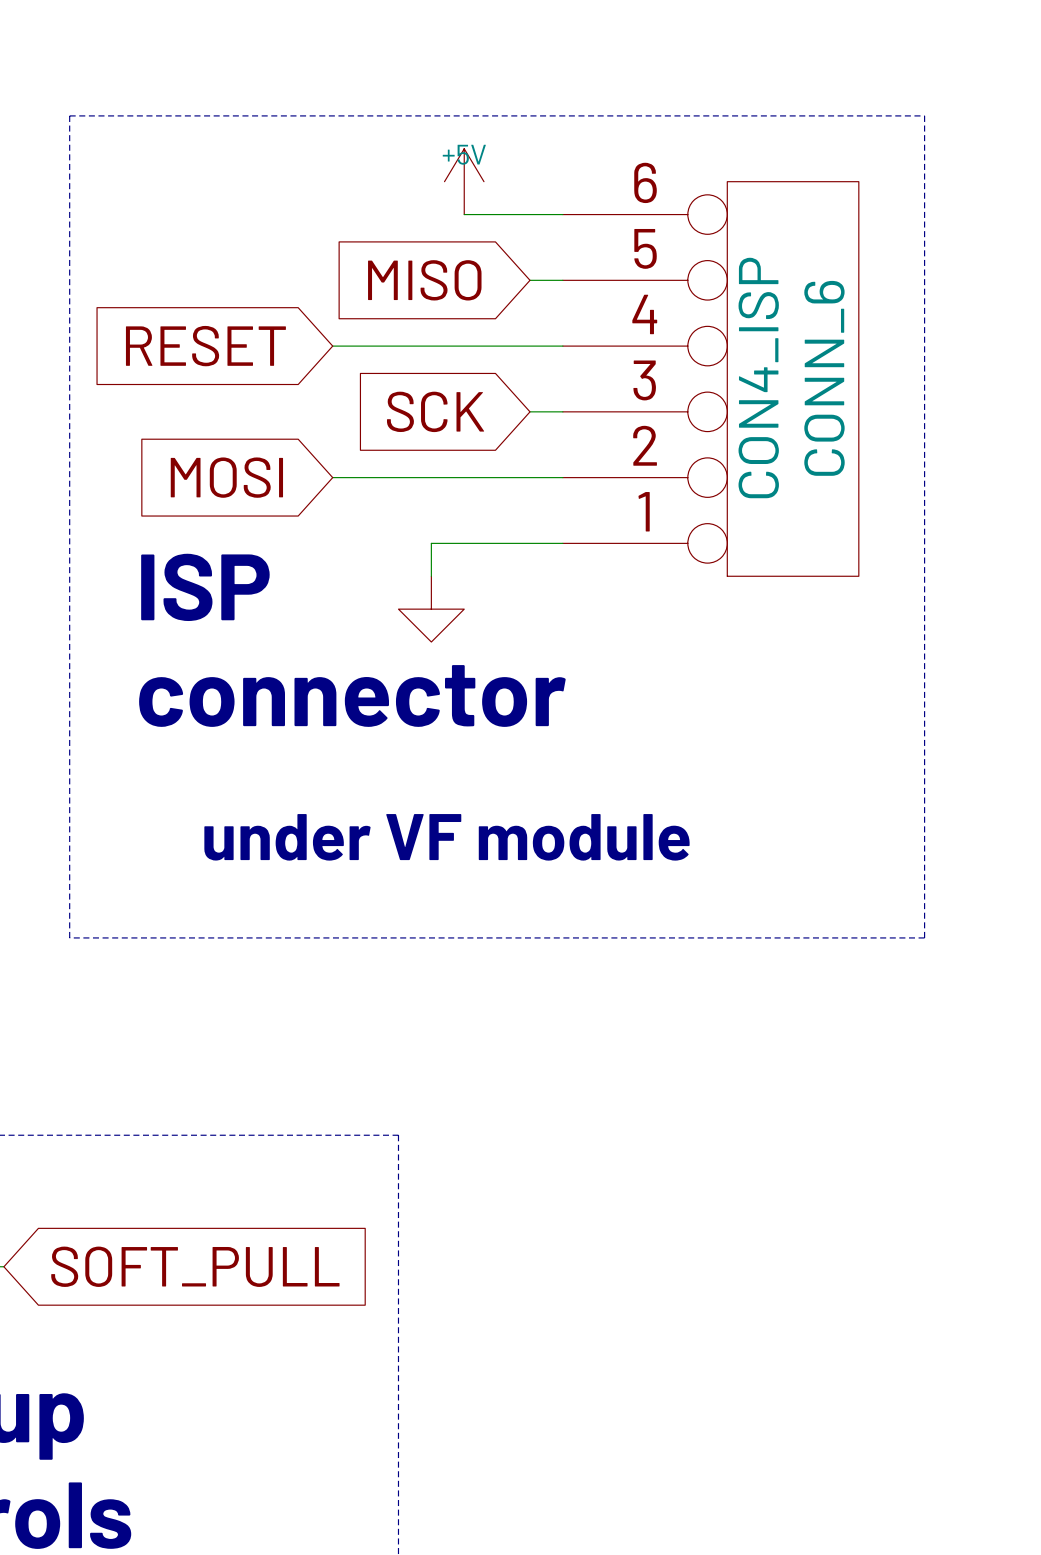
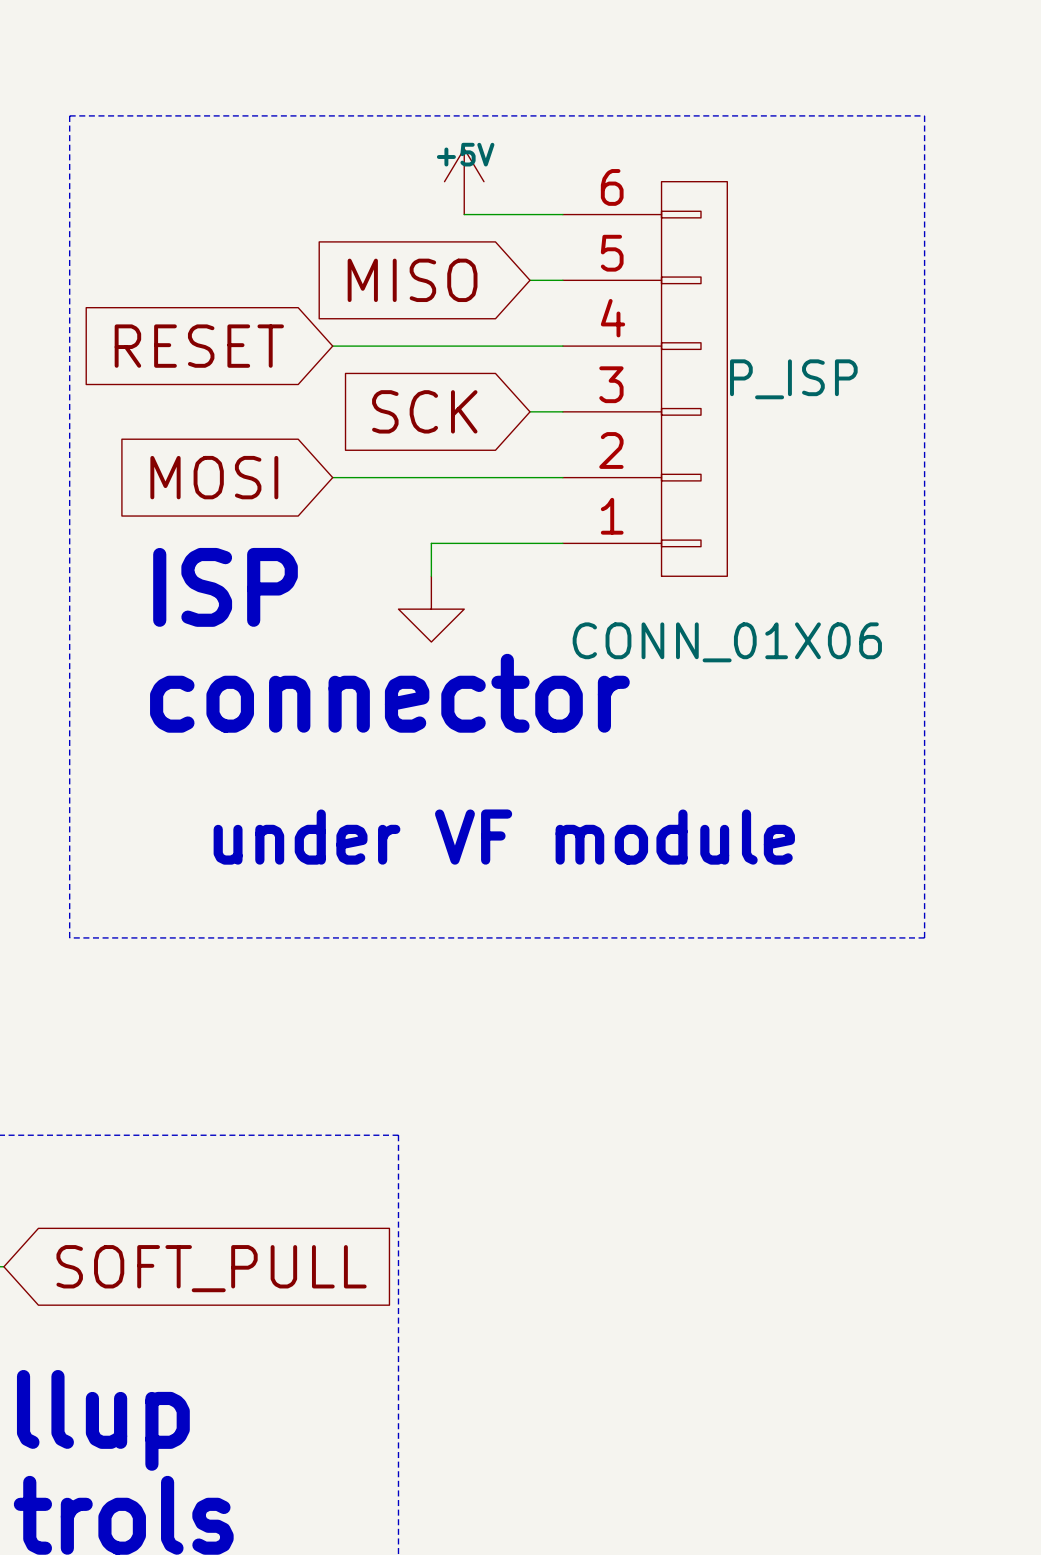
P_ISP: none -> CONN_01X06 (645, 378)
CON4_ISP: CONN_6 (710, 378) -> none

